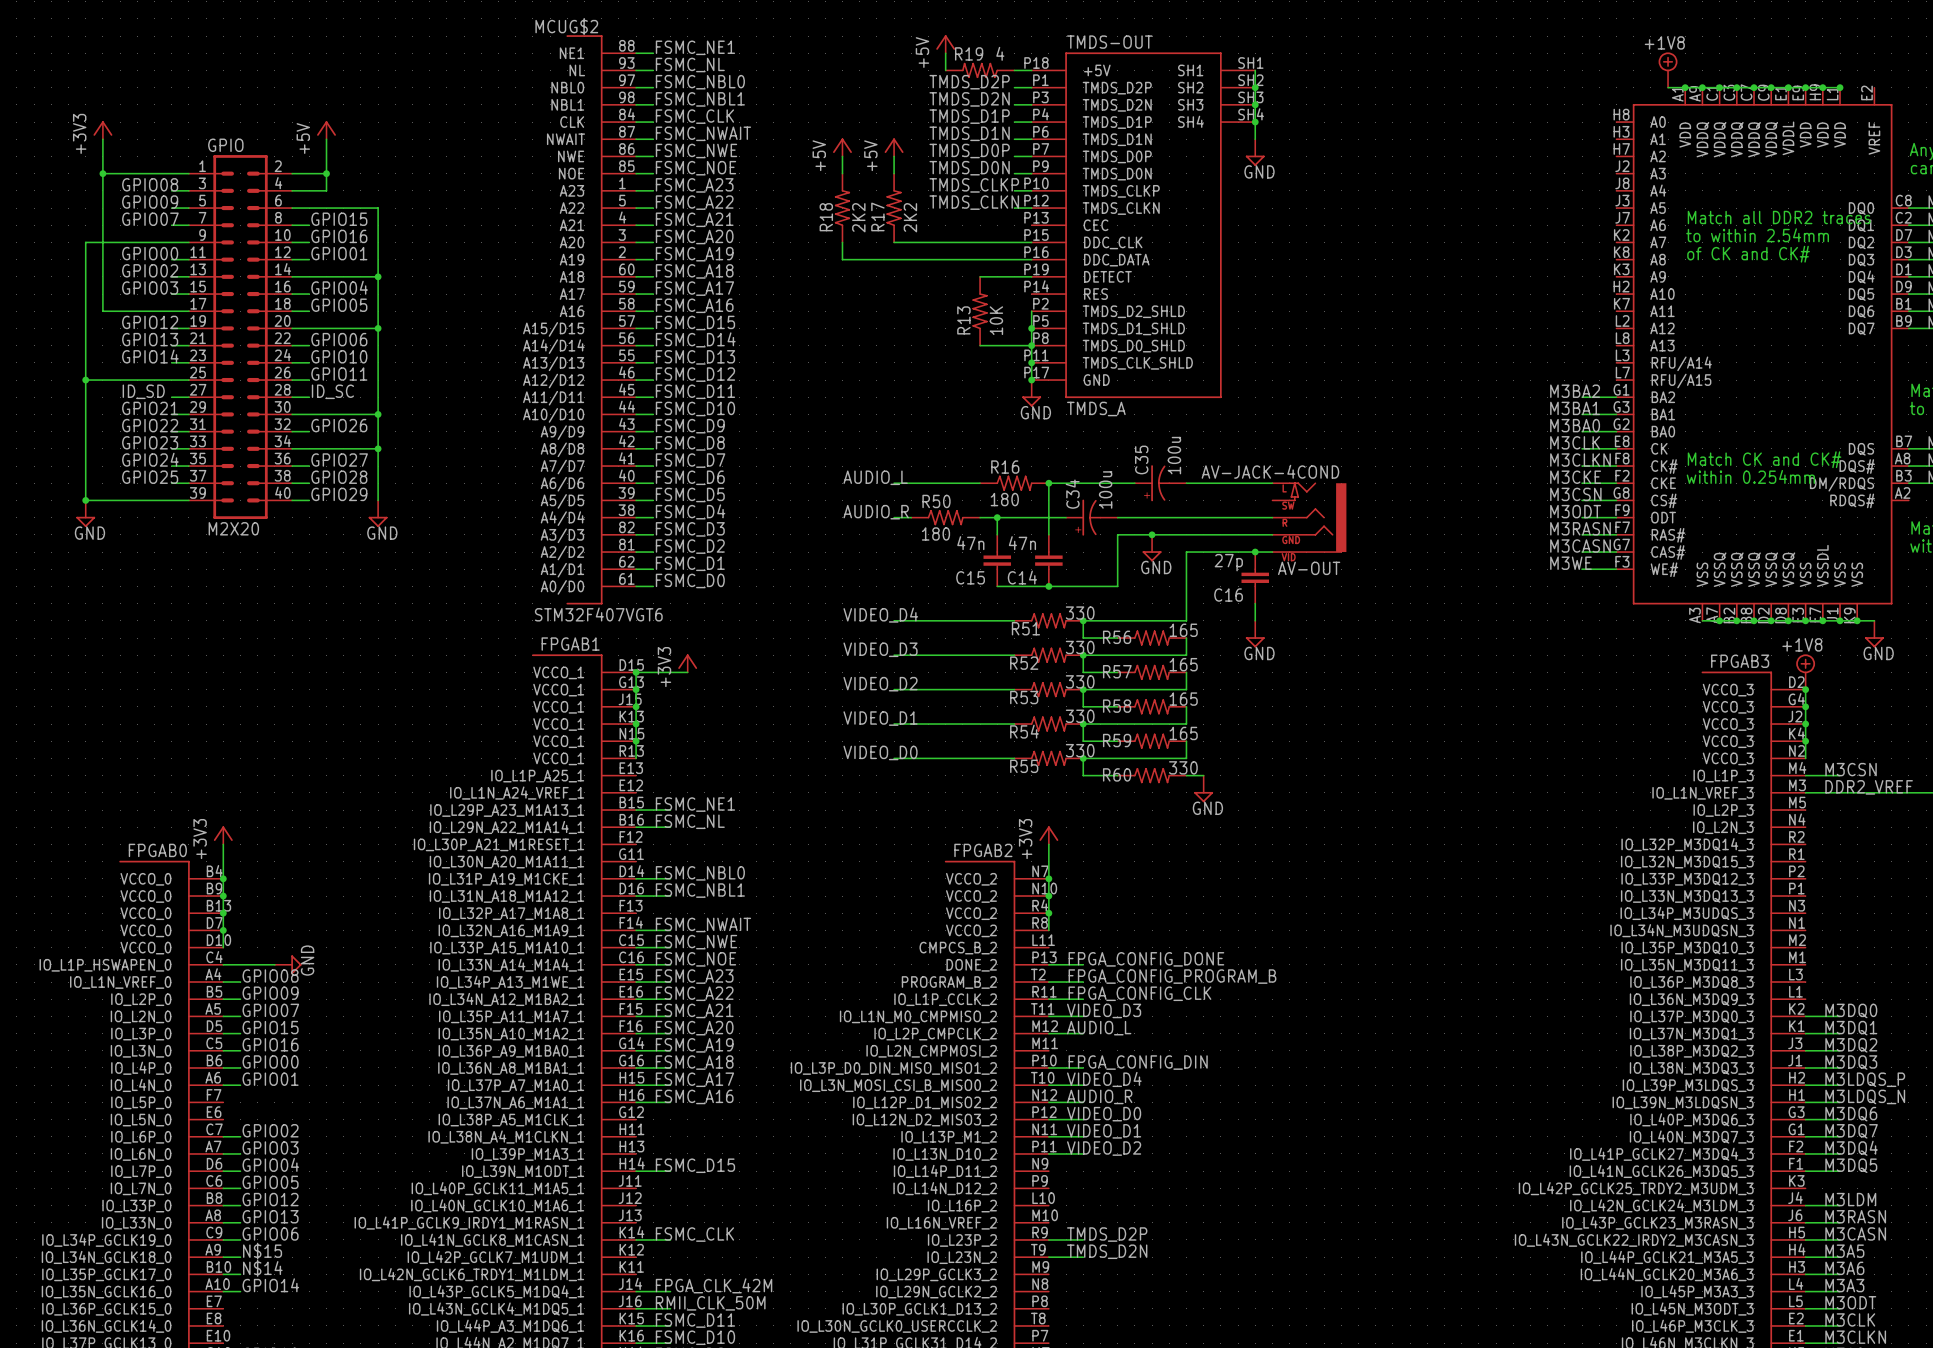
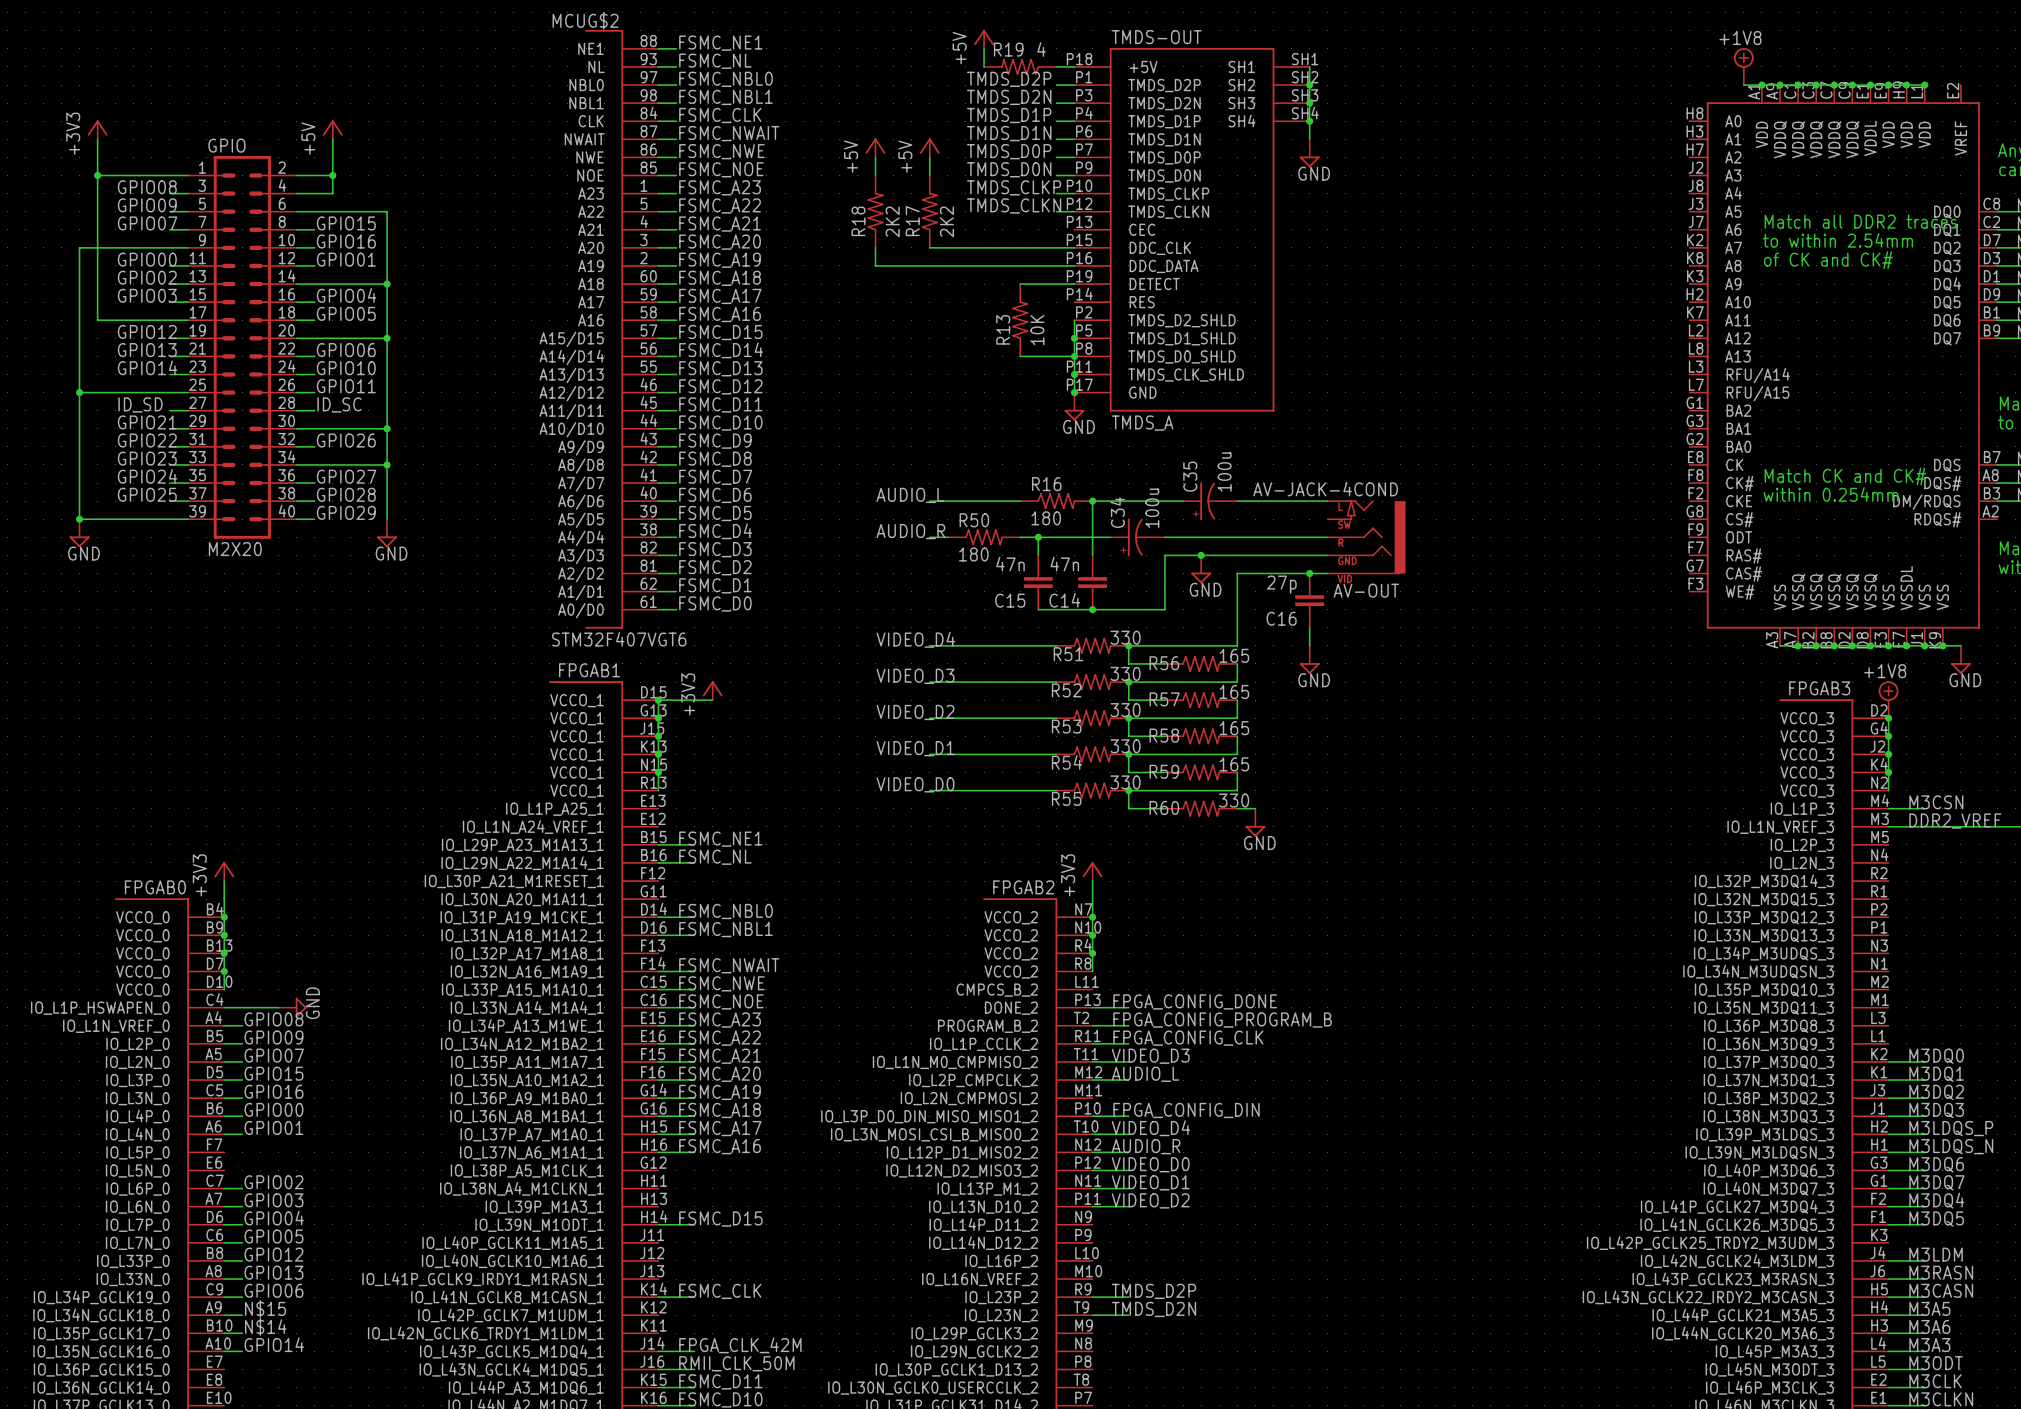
label: M3BA2 (1575, 391) -> none
wire: (1582, 397) (1616, 397) -> none
label: M3BA1 (1575, 408) -> none
wire: (1582, 414) (1616, 414) -> none
label: M3BA0 (1575, 425) -> none
wire: (1582, 431) (1616, 431) -> none
label: M3CLK (1575, 442) -> none
wire: (1582, 448) (1616, 448) -> none
label: M3CLKN (1580, 460) -> none
wire: (1582, 466) (1616, 466) -> none
label: M3CKE (1575, 477) -> none
wire: (1582, 483) (1616, 483) -> none
label: M3CSN (1575, 494) -> none
wire: (1582, 500) (1616, 500) -> none
label: M3ODT (1575, 511) -> none
wire: (1582, 517) (1616, 517) -> none
label: M3RASN (1580, 528) -> none
wire: (1582, 534) (1616, 534) -> none
label: M3CASN (1580, 546) -> none
wire: (1582, 552) (1616, 552) -> none
label: M3WE (1570, 563) -> none
wire: (1582, 569) (1616, 569) -> none

